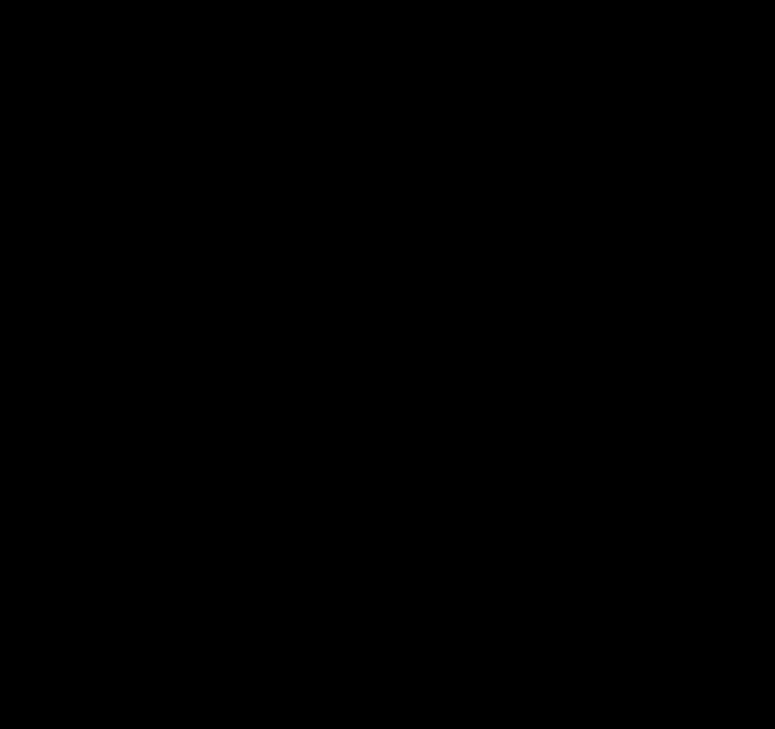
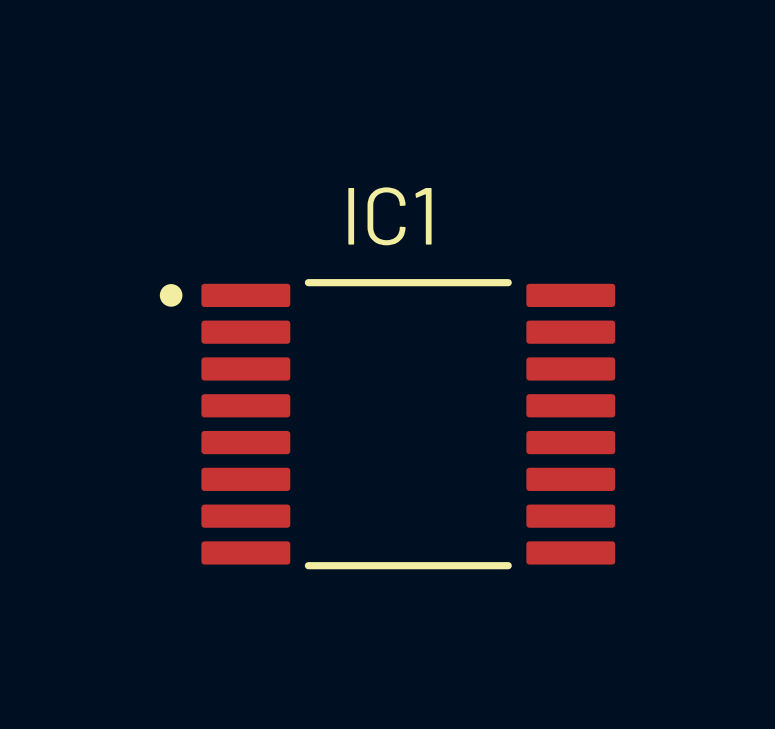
IC1: none -> (387, 424)

